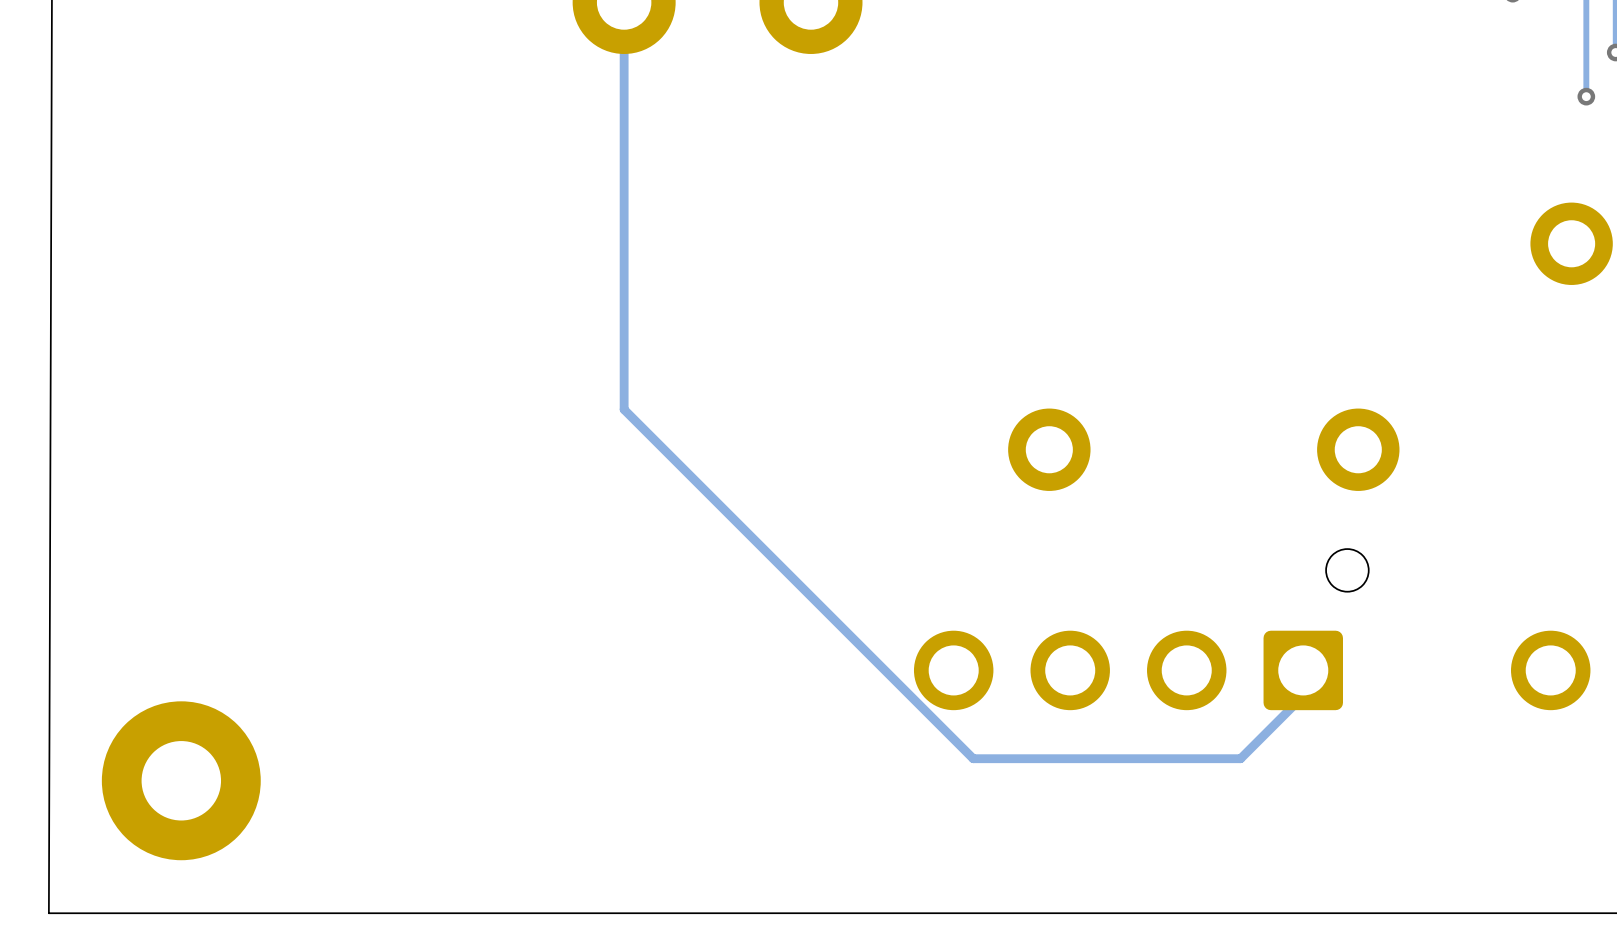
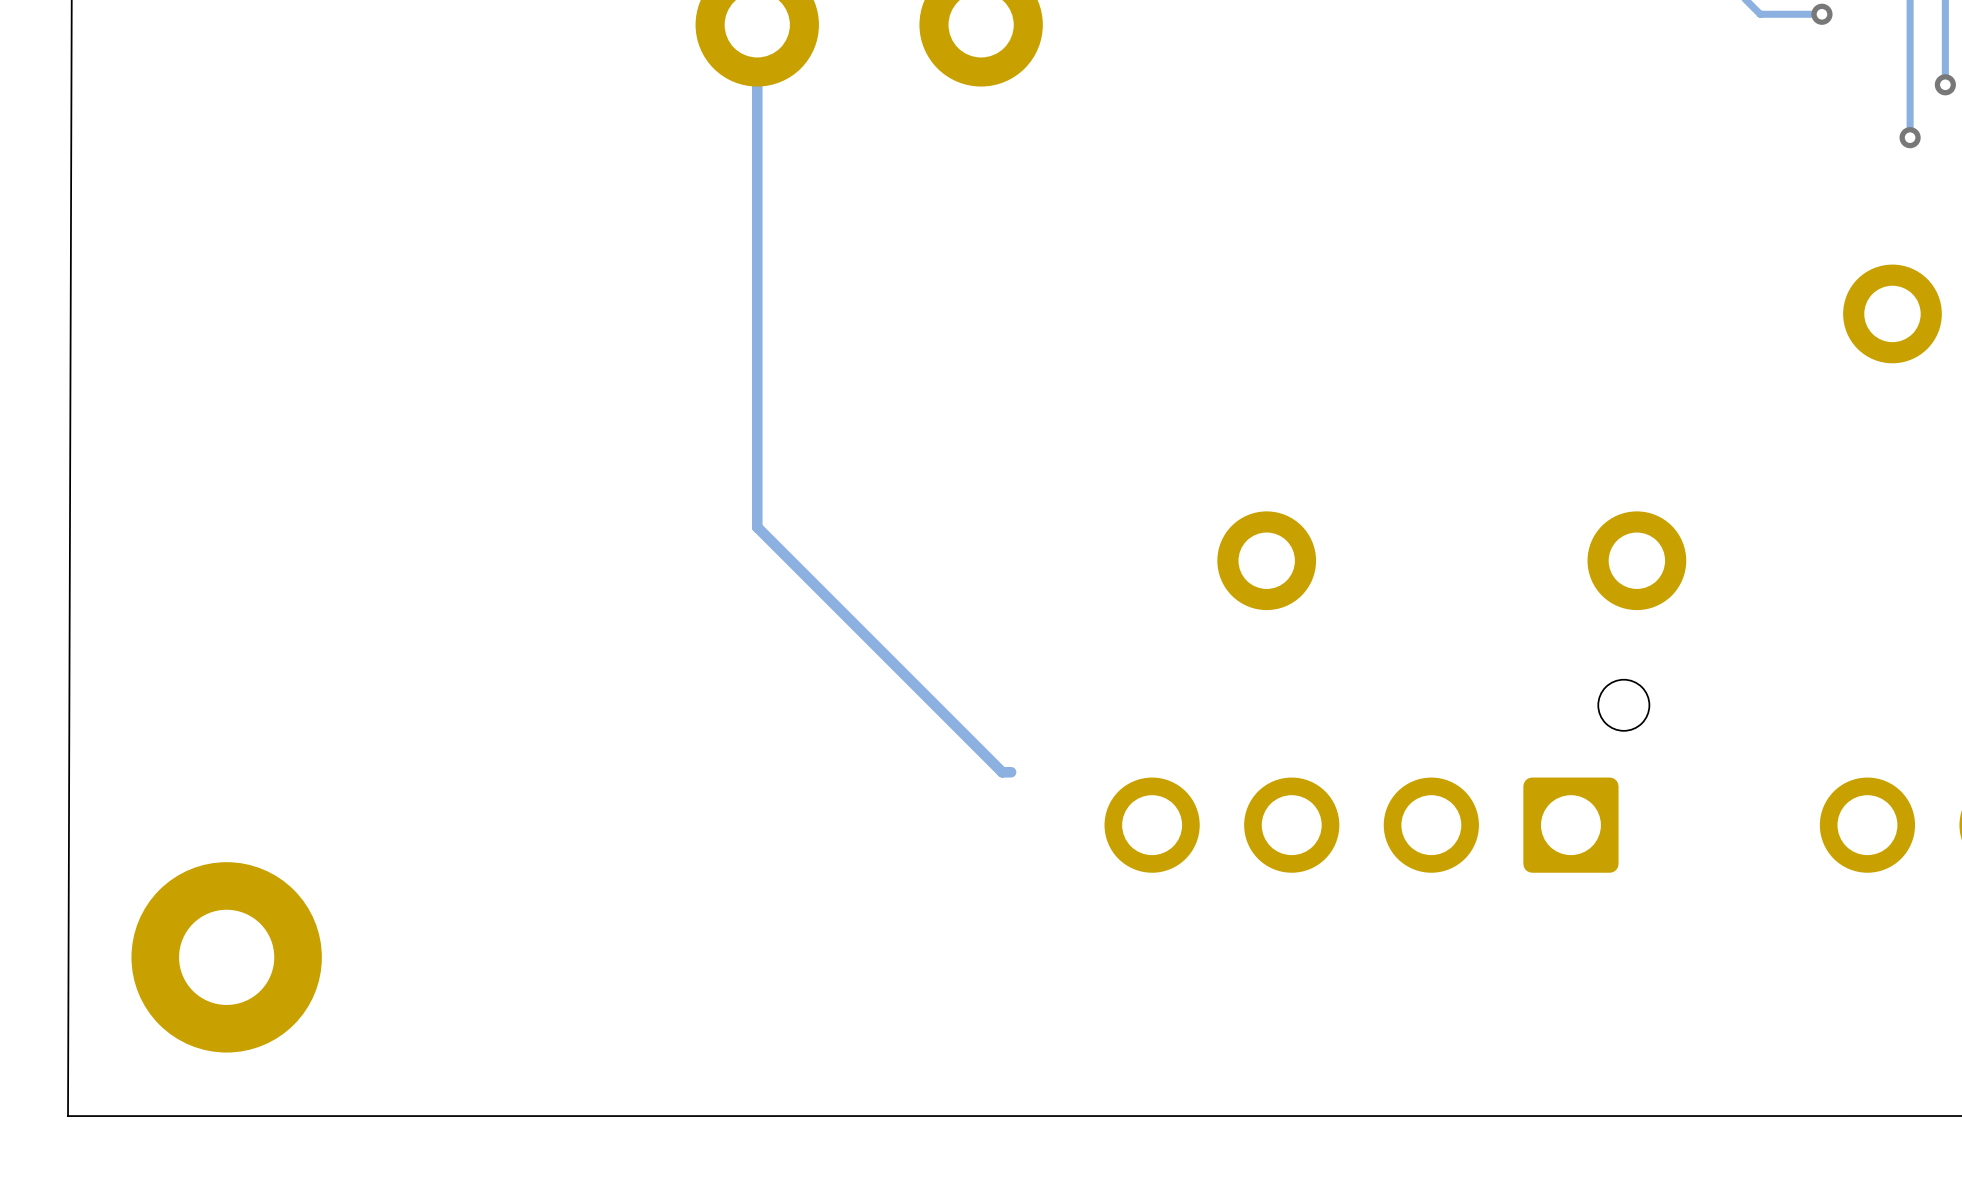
track: (624, 409) (973, 758) (1240, 758) (1303, 696) -> (757, 512) (757, 527) (1002, 772) (1011, 772)

